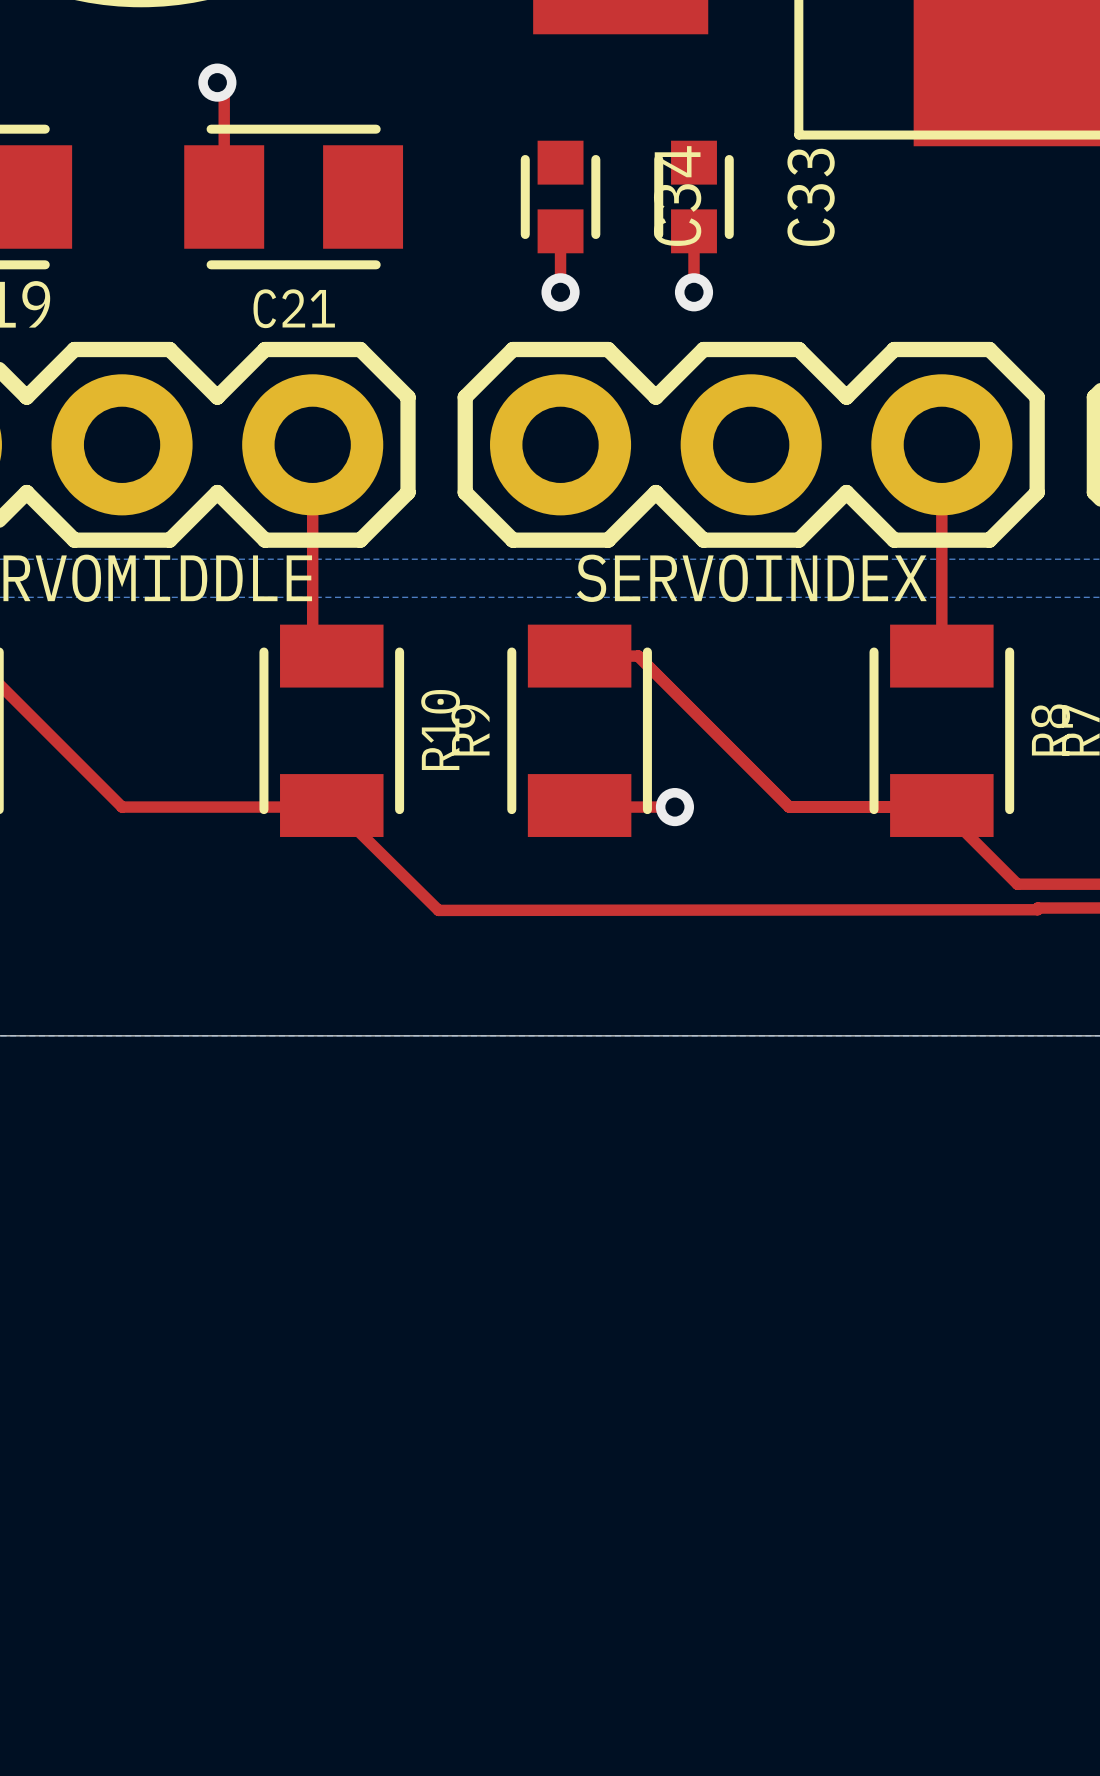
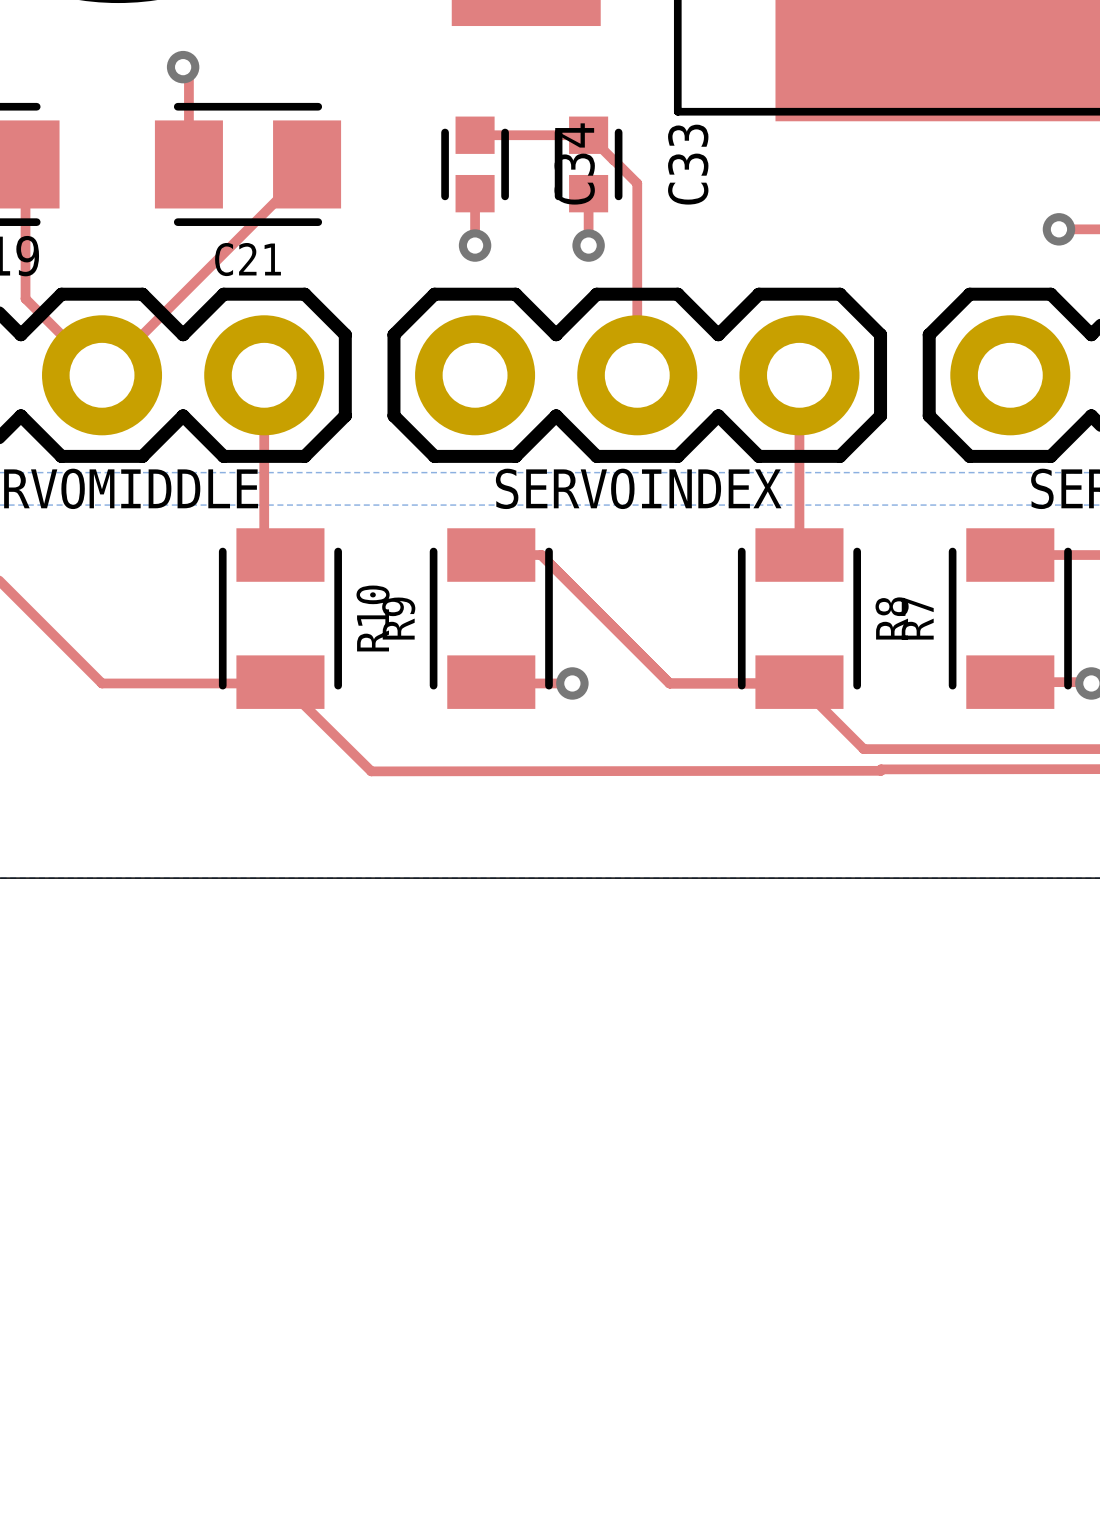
top track: none -> (475, 135) (588, 135) (637, 183) (637, 375)
top track: none -> (25, 164) (25, 298) (102, 375) (307, 170) (307, 164)

